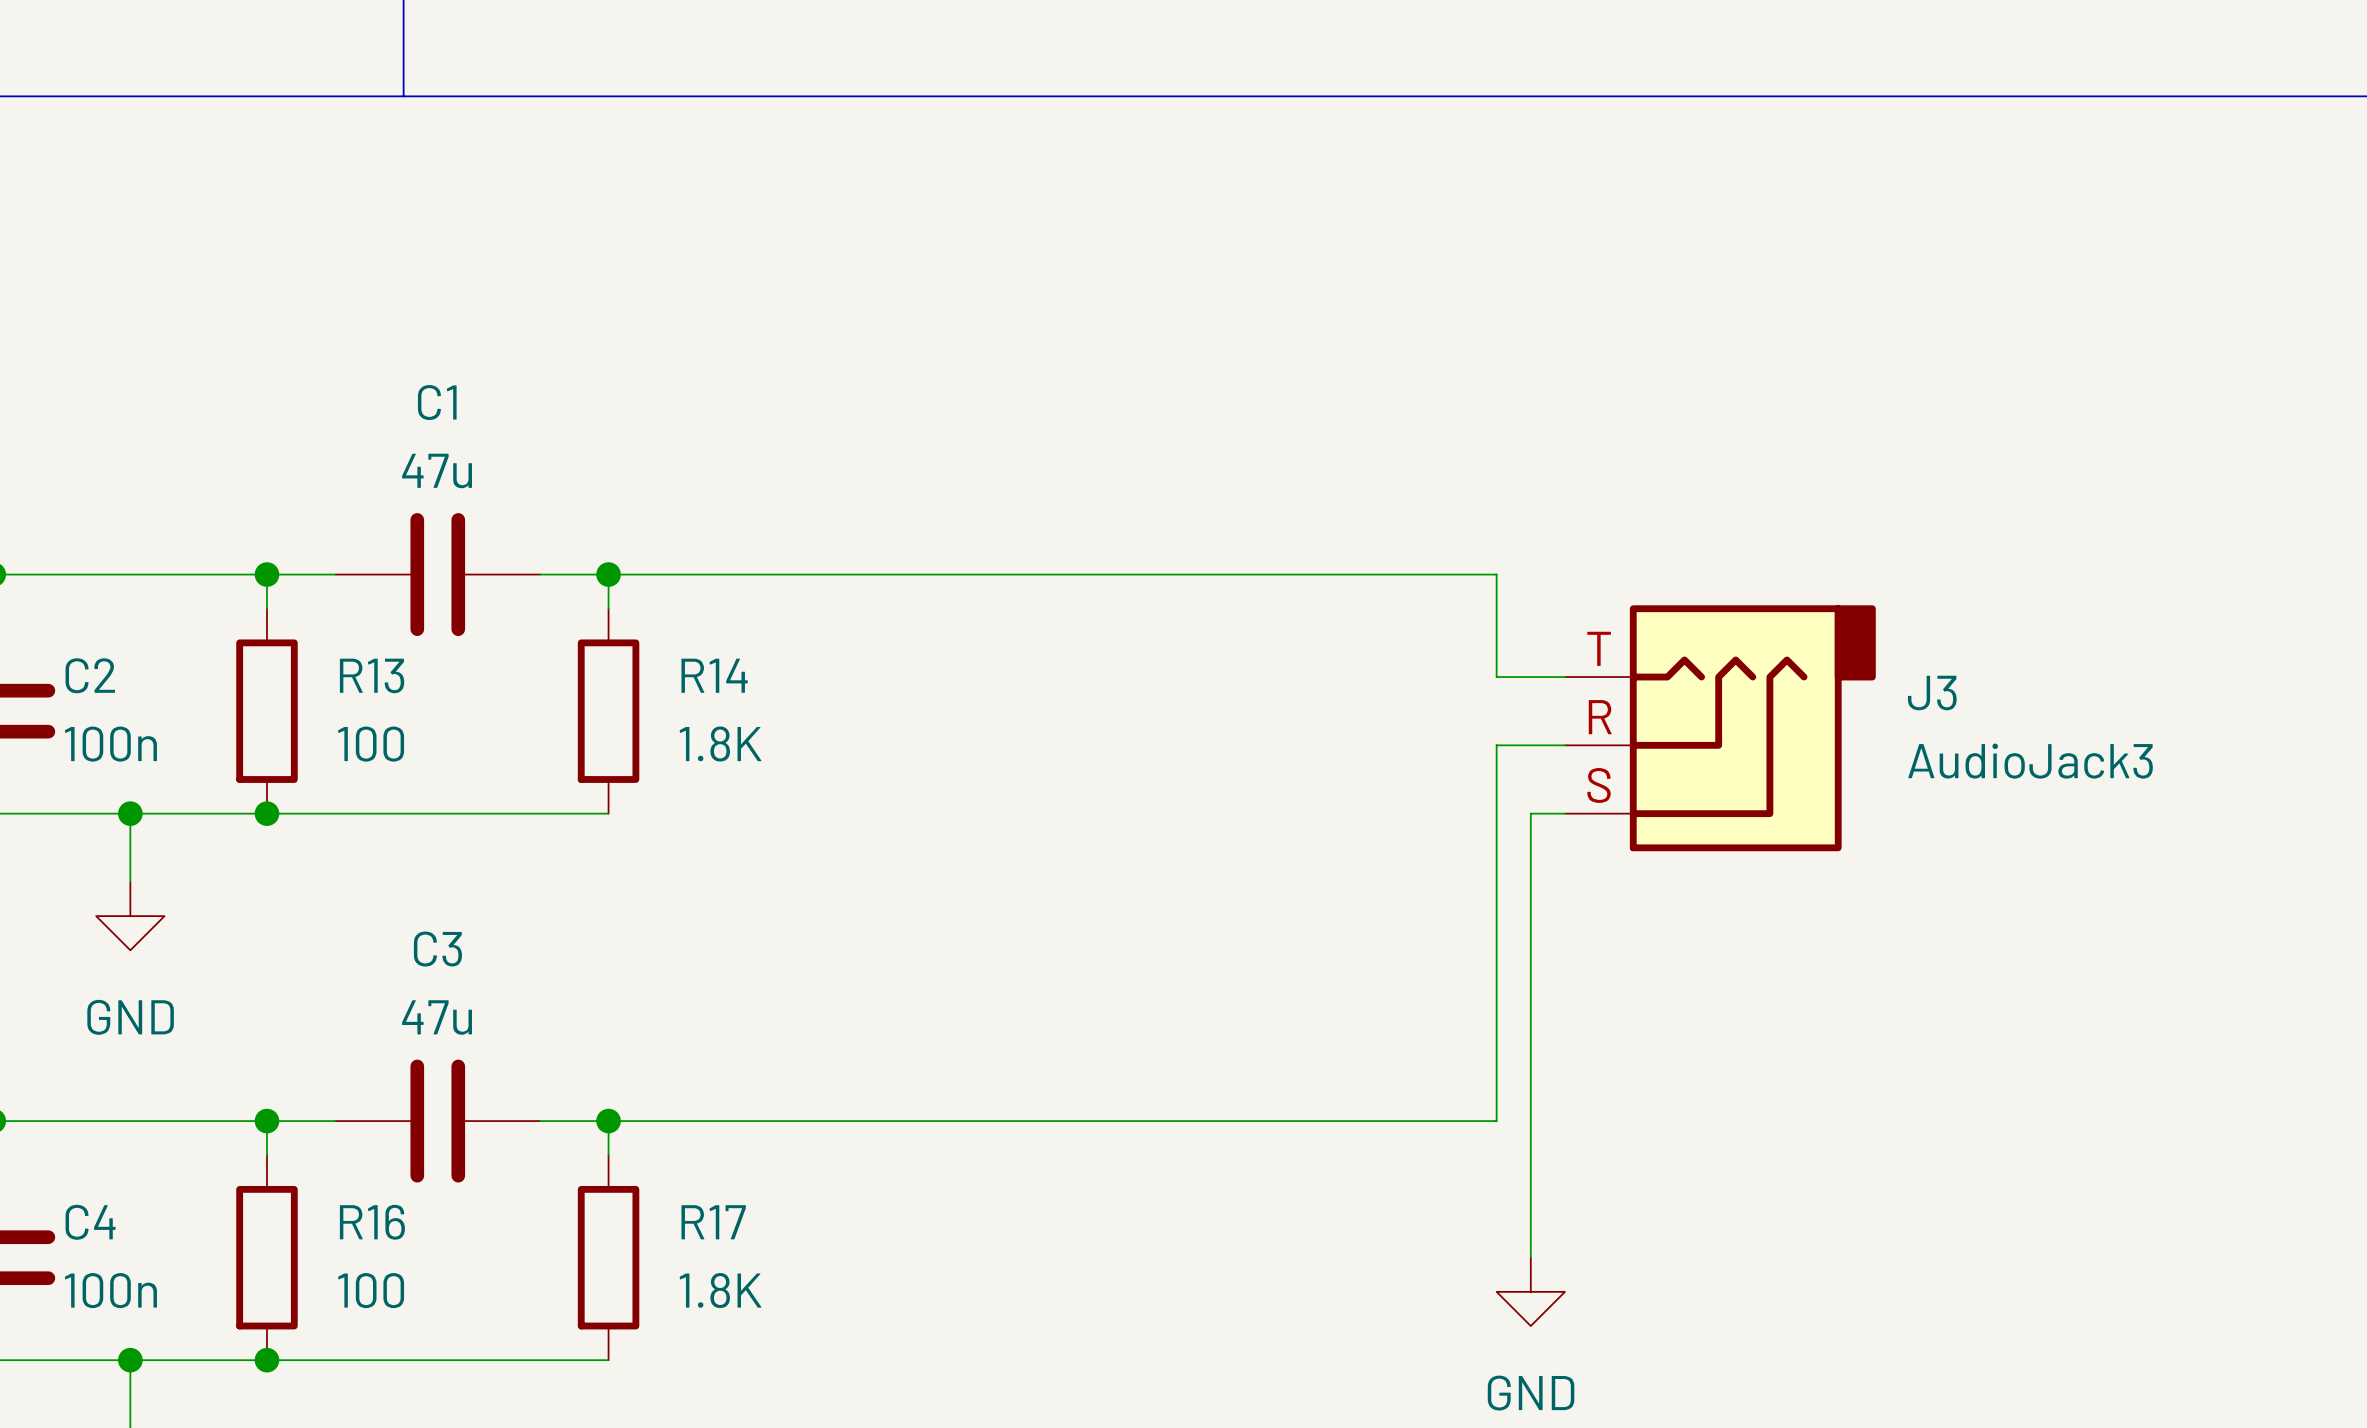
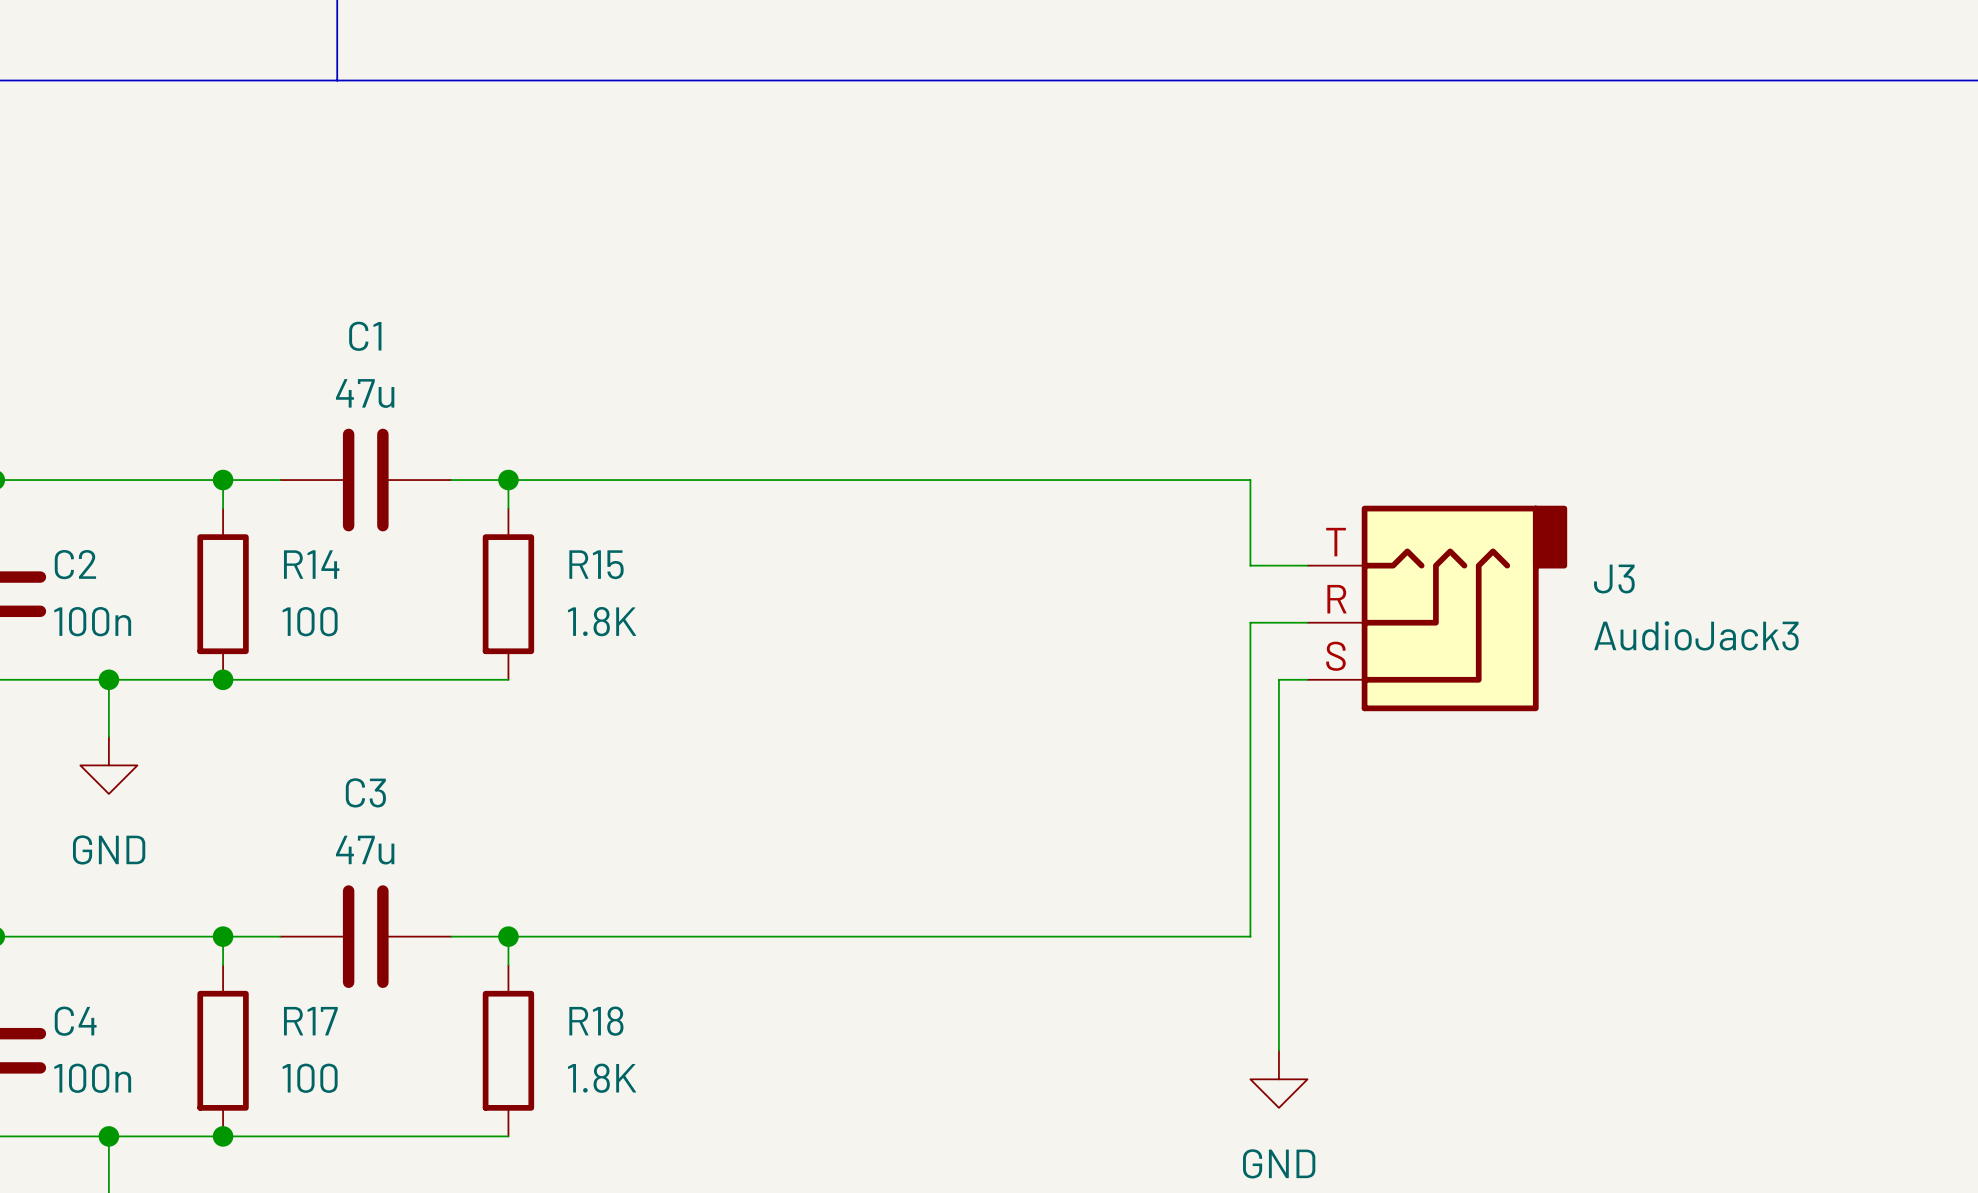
R13 name: R13 (372, 675) -> R14 (311, 564)
R14 name: R14 (714, 675) -> R15 (596, 564)
R16 name: R16 (372, 1222) -> R17 (310, 1021)
R17 name: R17 (713, 1222) -> R18 (596, 1021)

